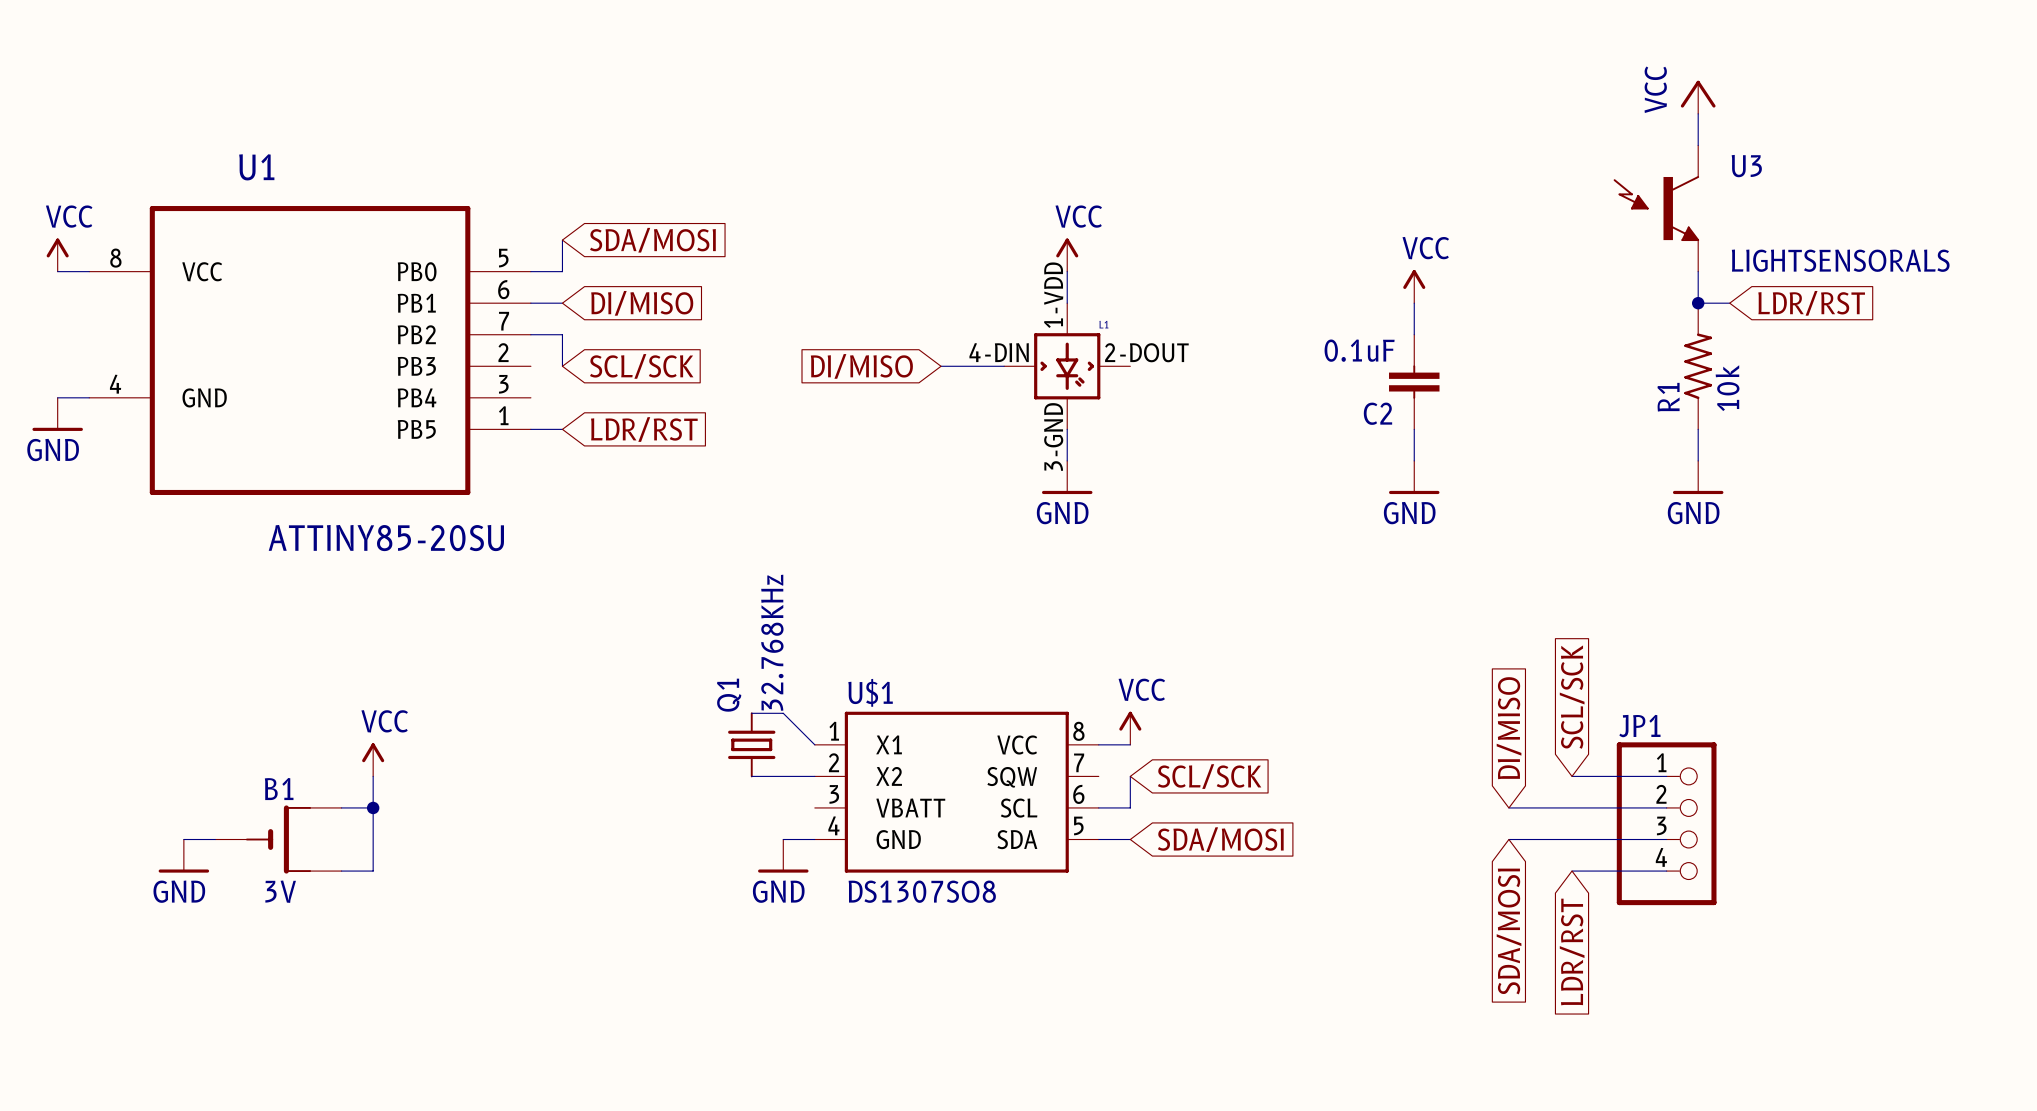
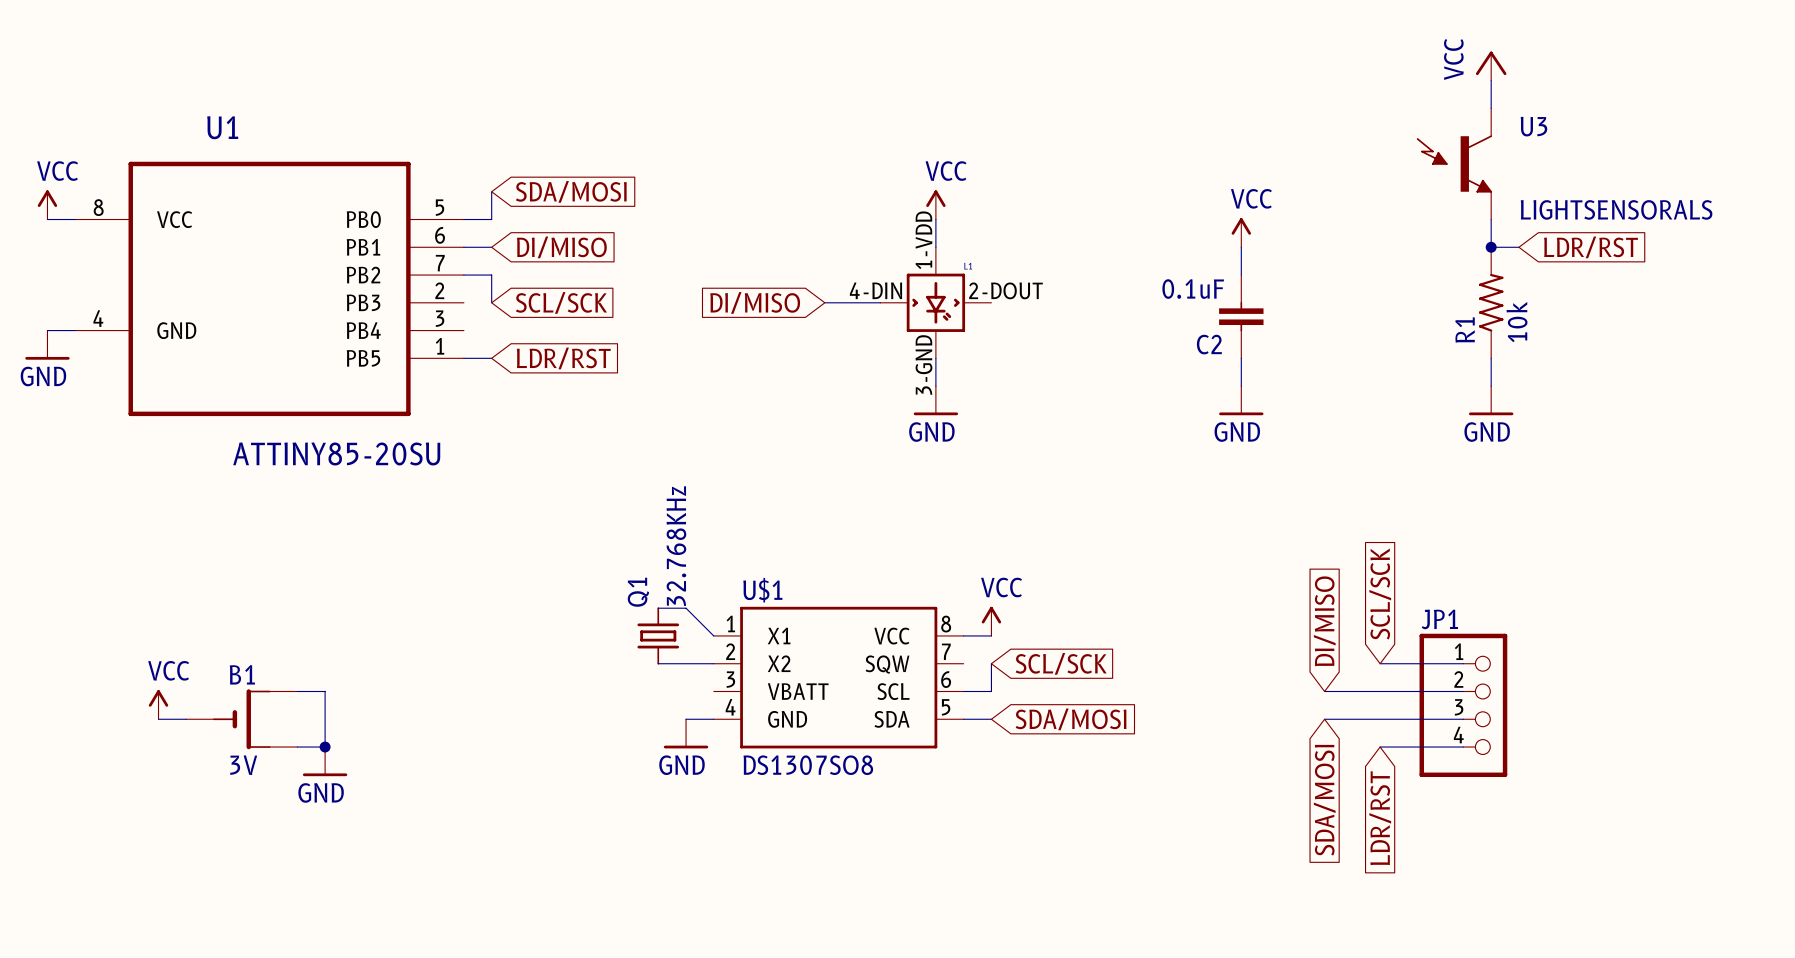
power symbol position: VCC (373, 759) -> VCC (158, 704)
wire: (373, 776) (373, 807) -> none
junction position: (373, 807) -> (325, 747)
power symbol position: GND (183, 856) -> GND (325, 761)

